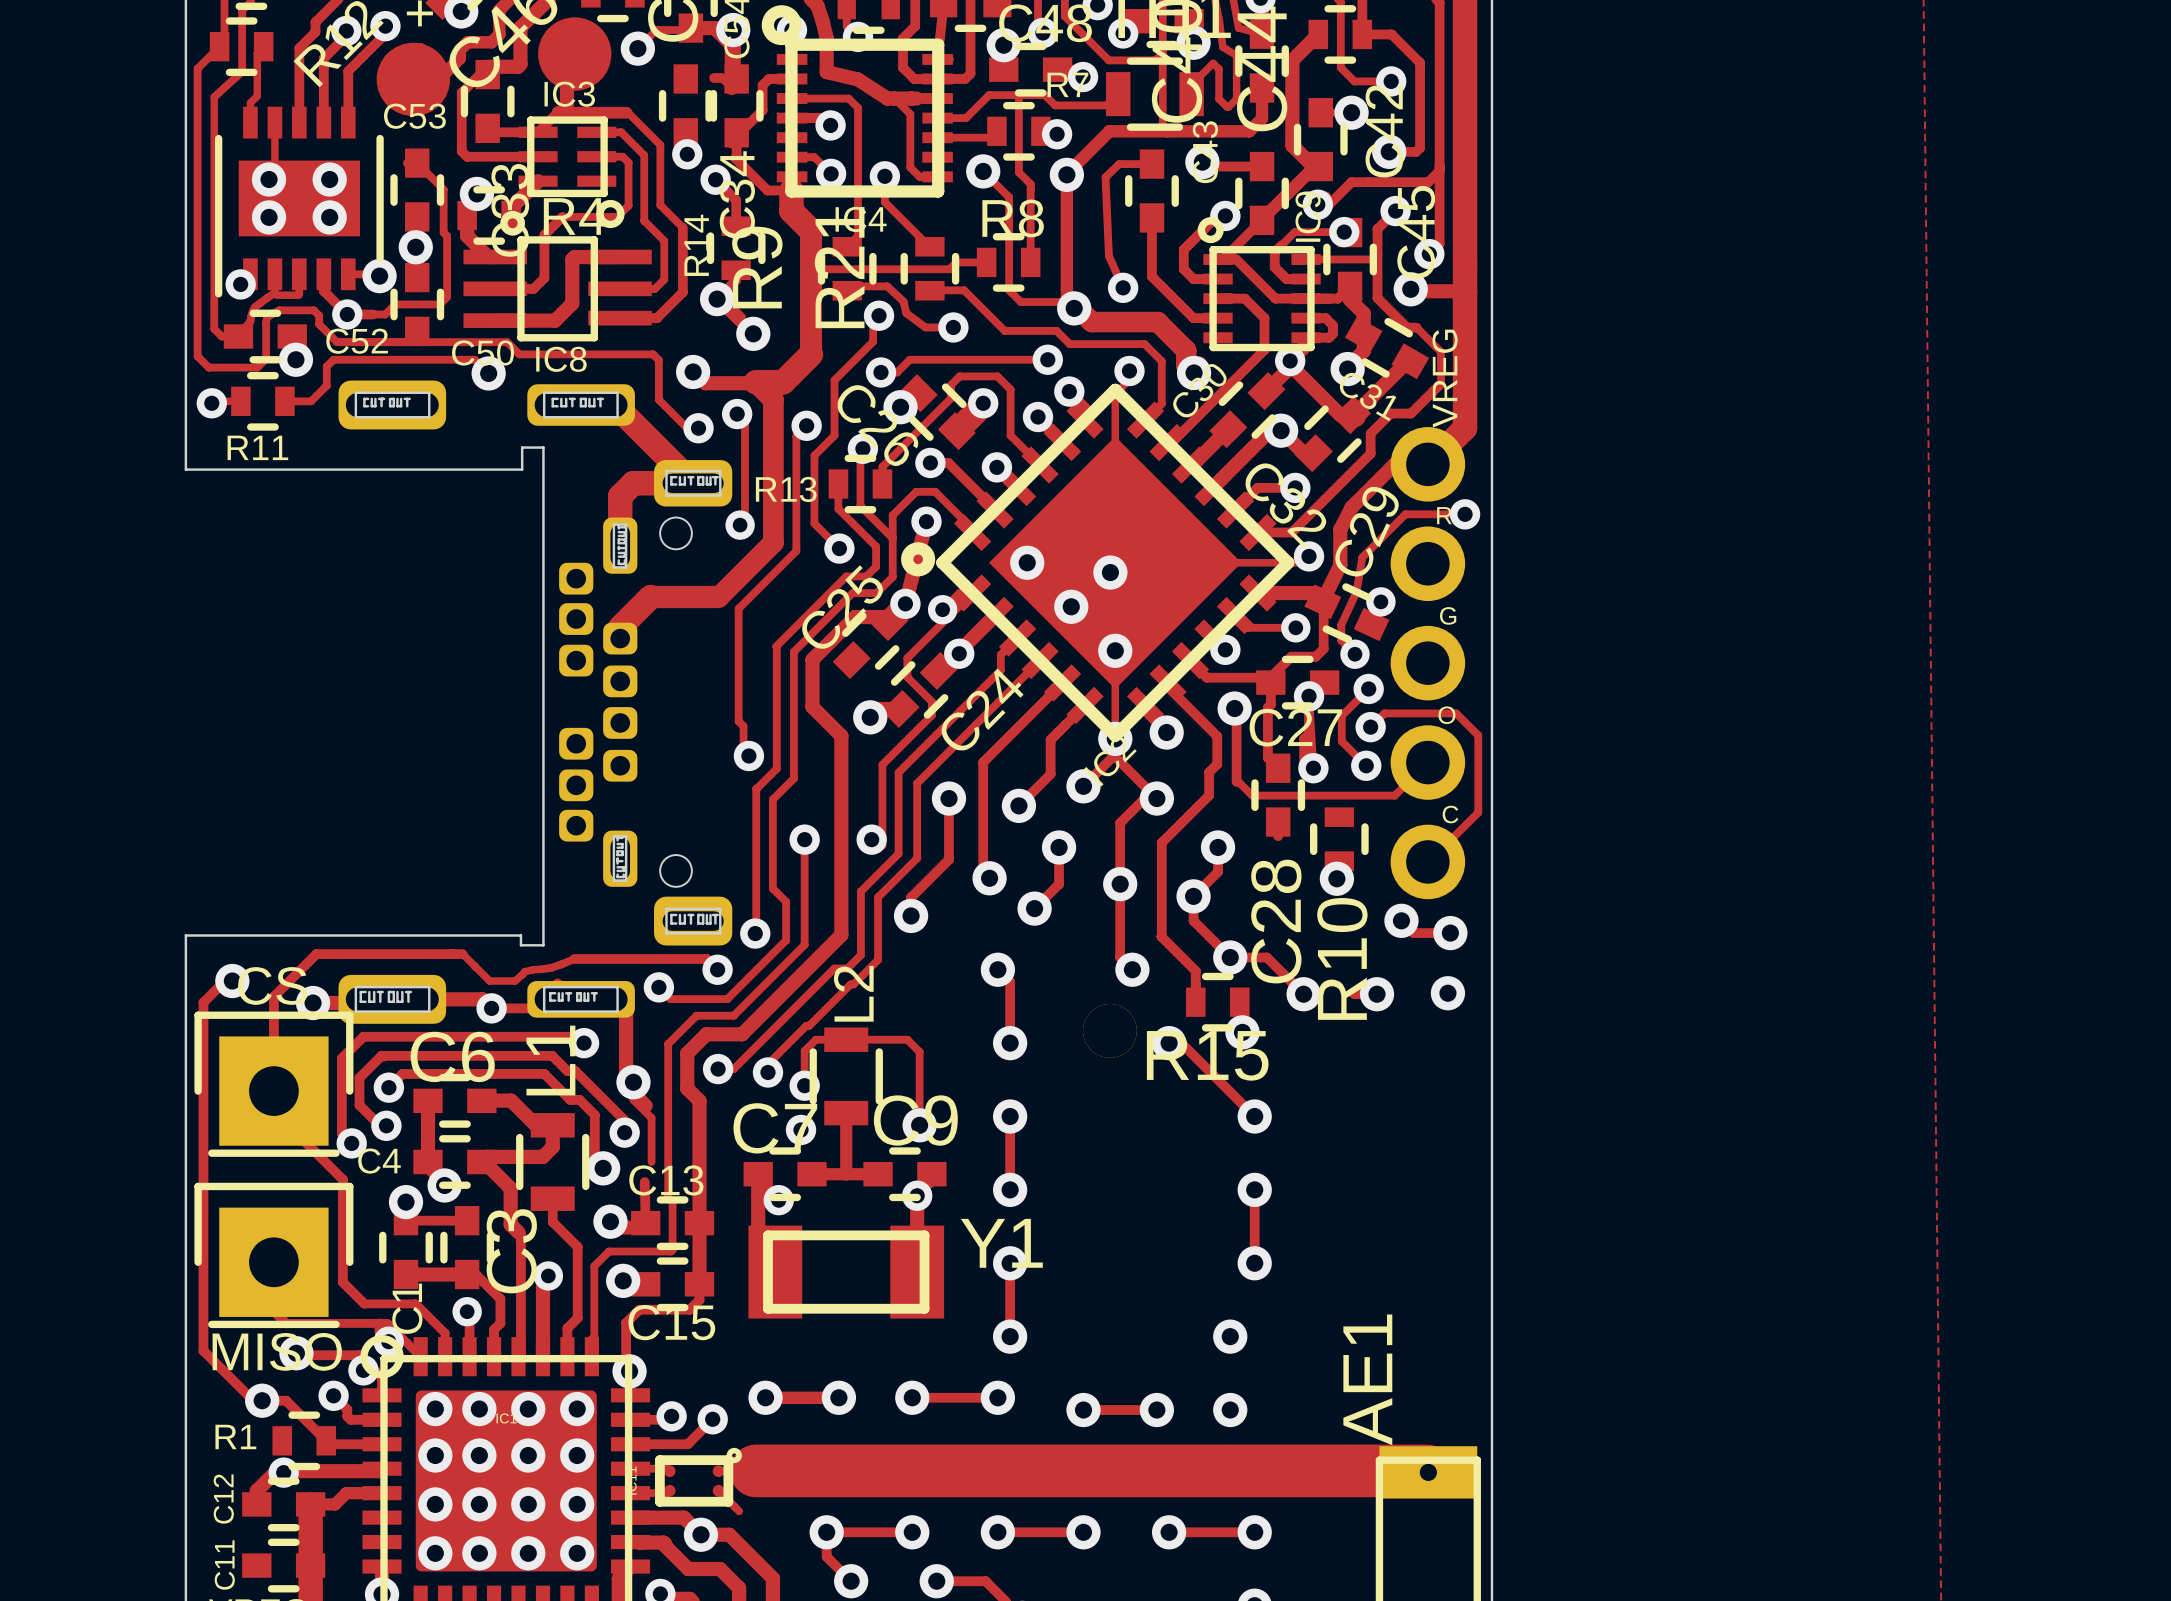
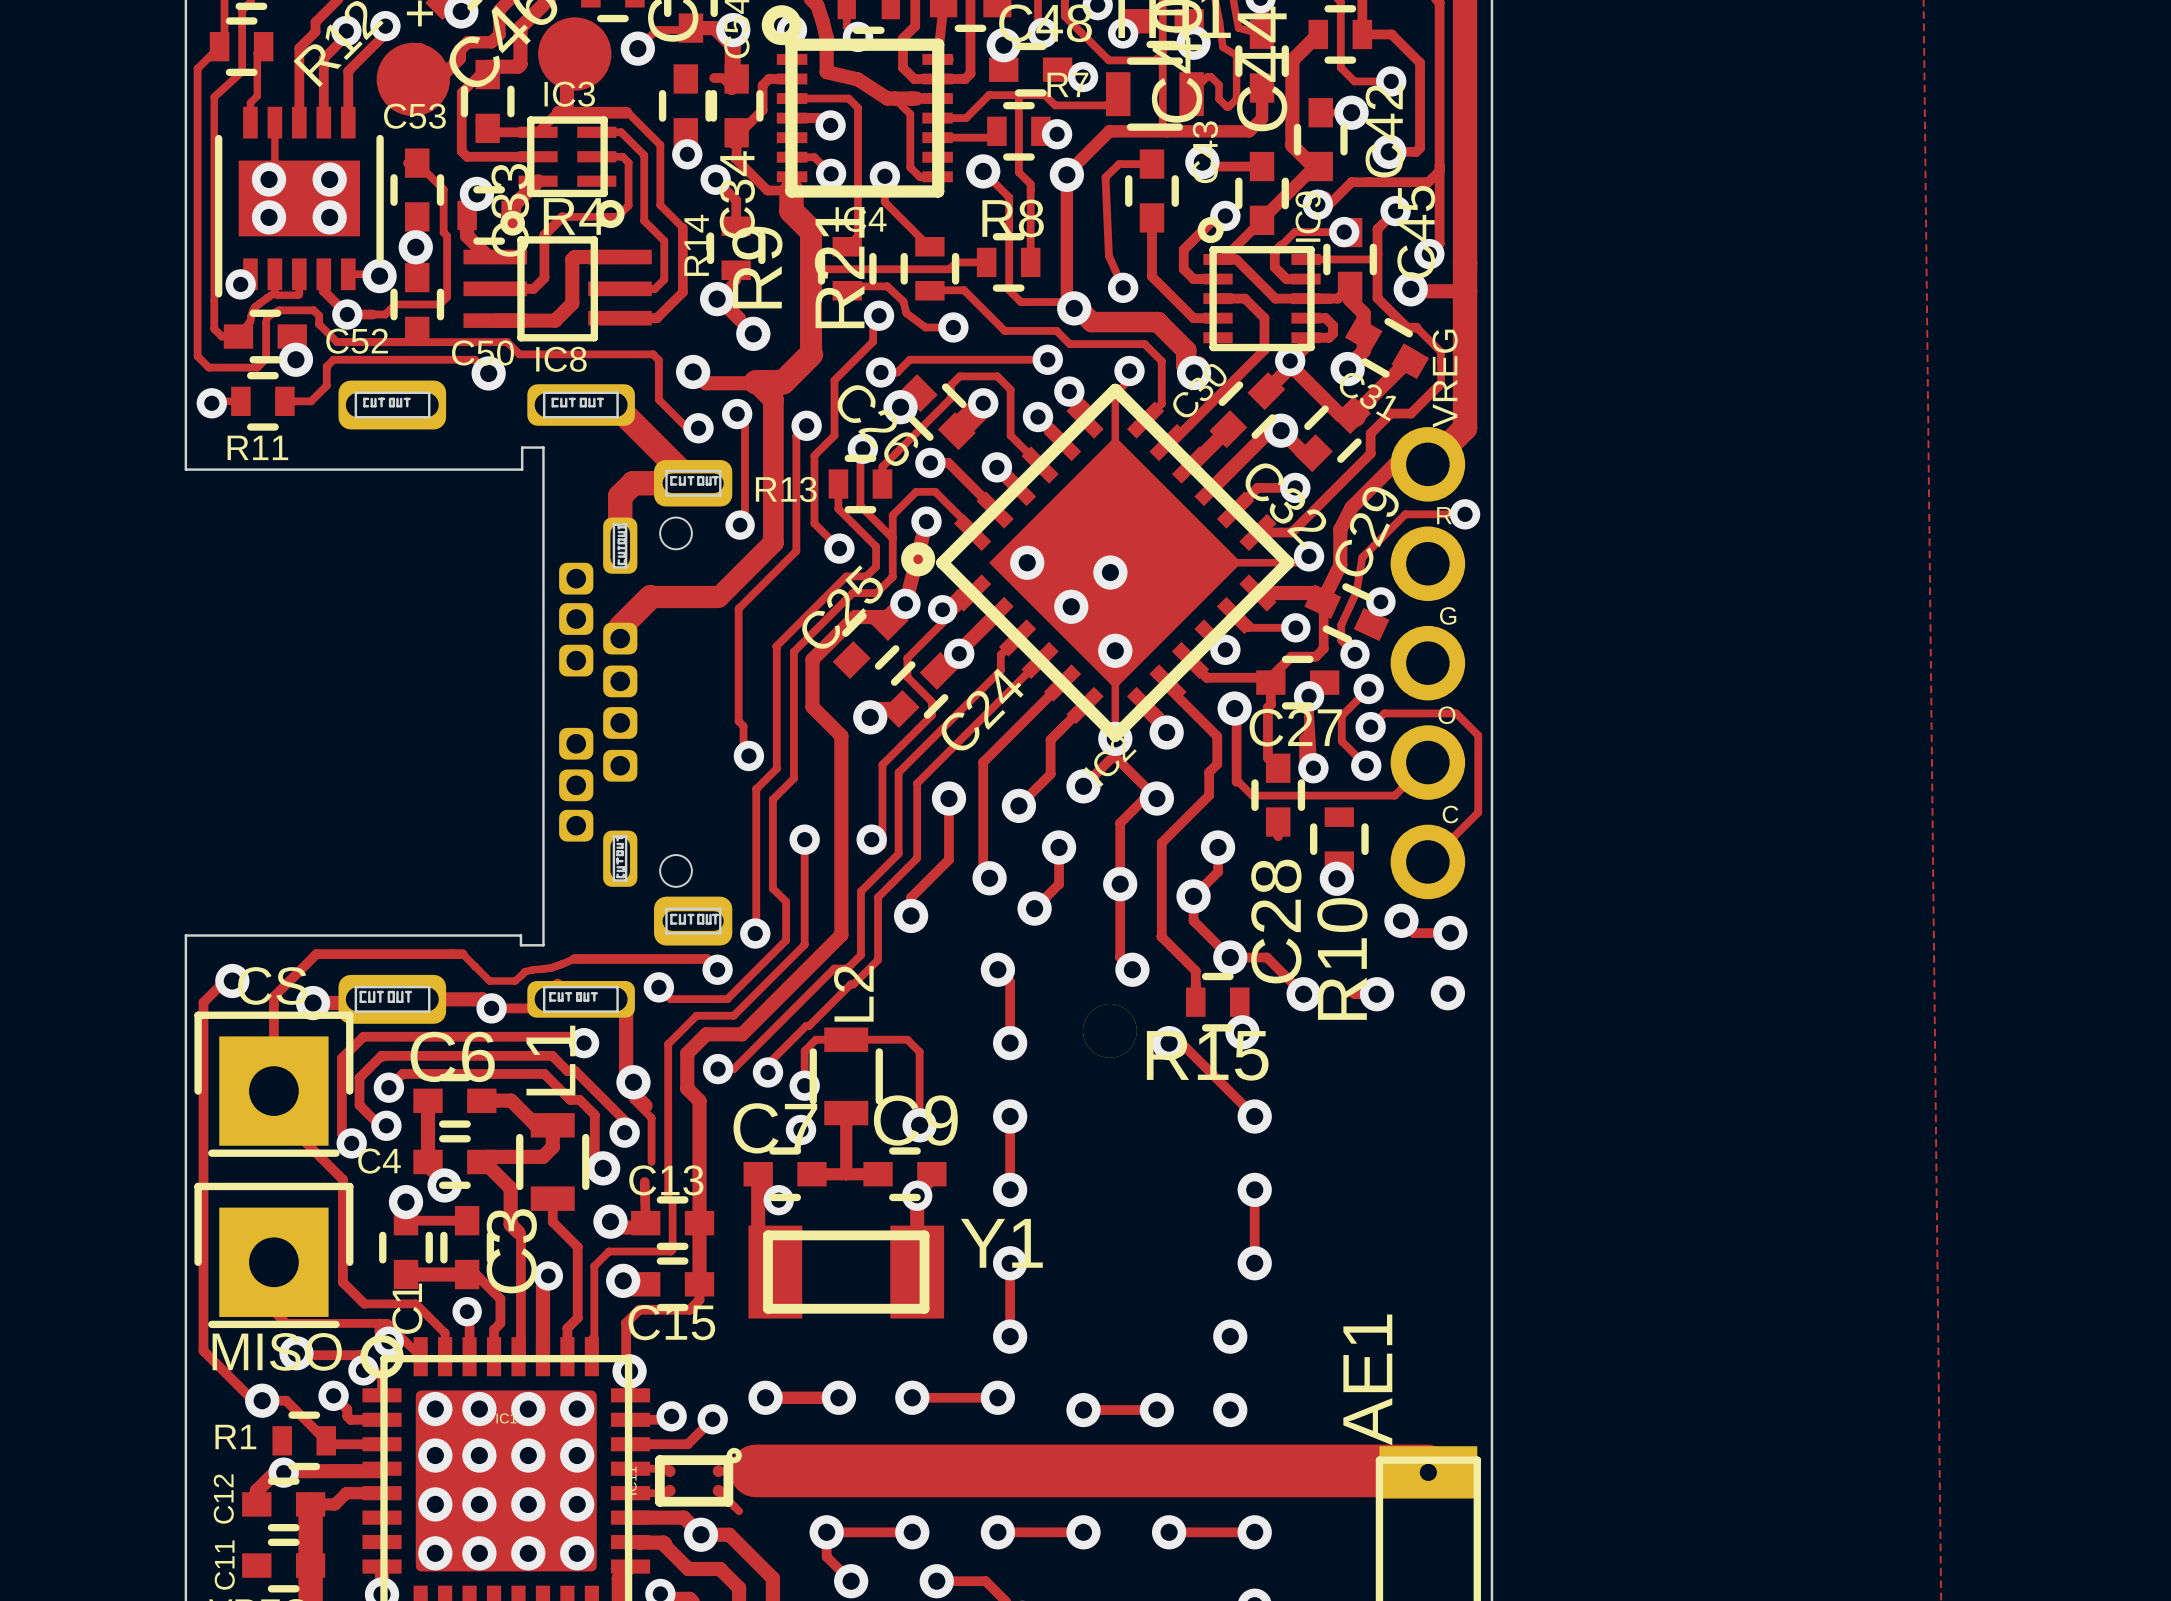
track: (1219, 84) (1219, 69) (1213, 63) (1191, 84) (1191, 92) -> (1219, 84) (1211, 77) (1207, 77) (1191, 92)

